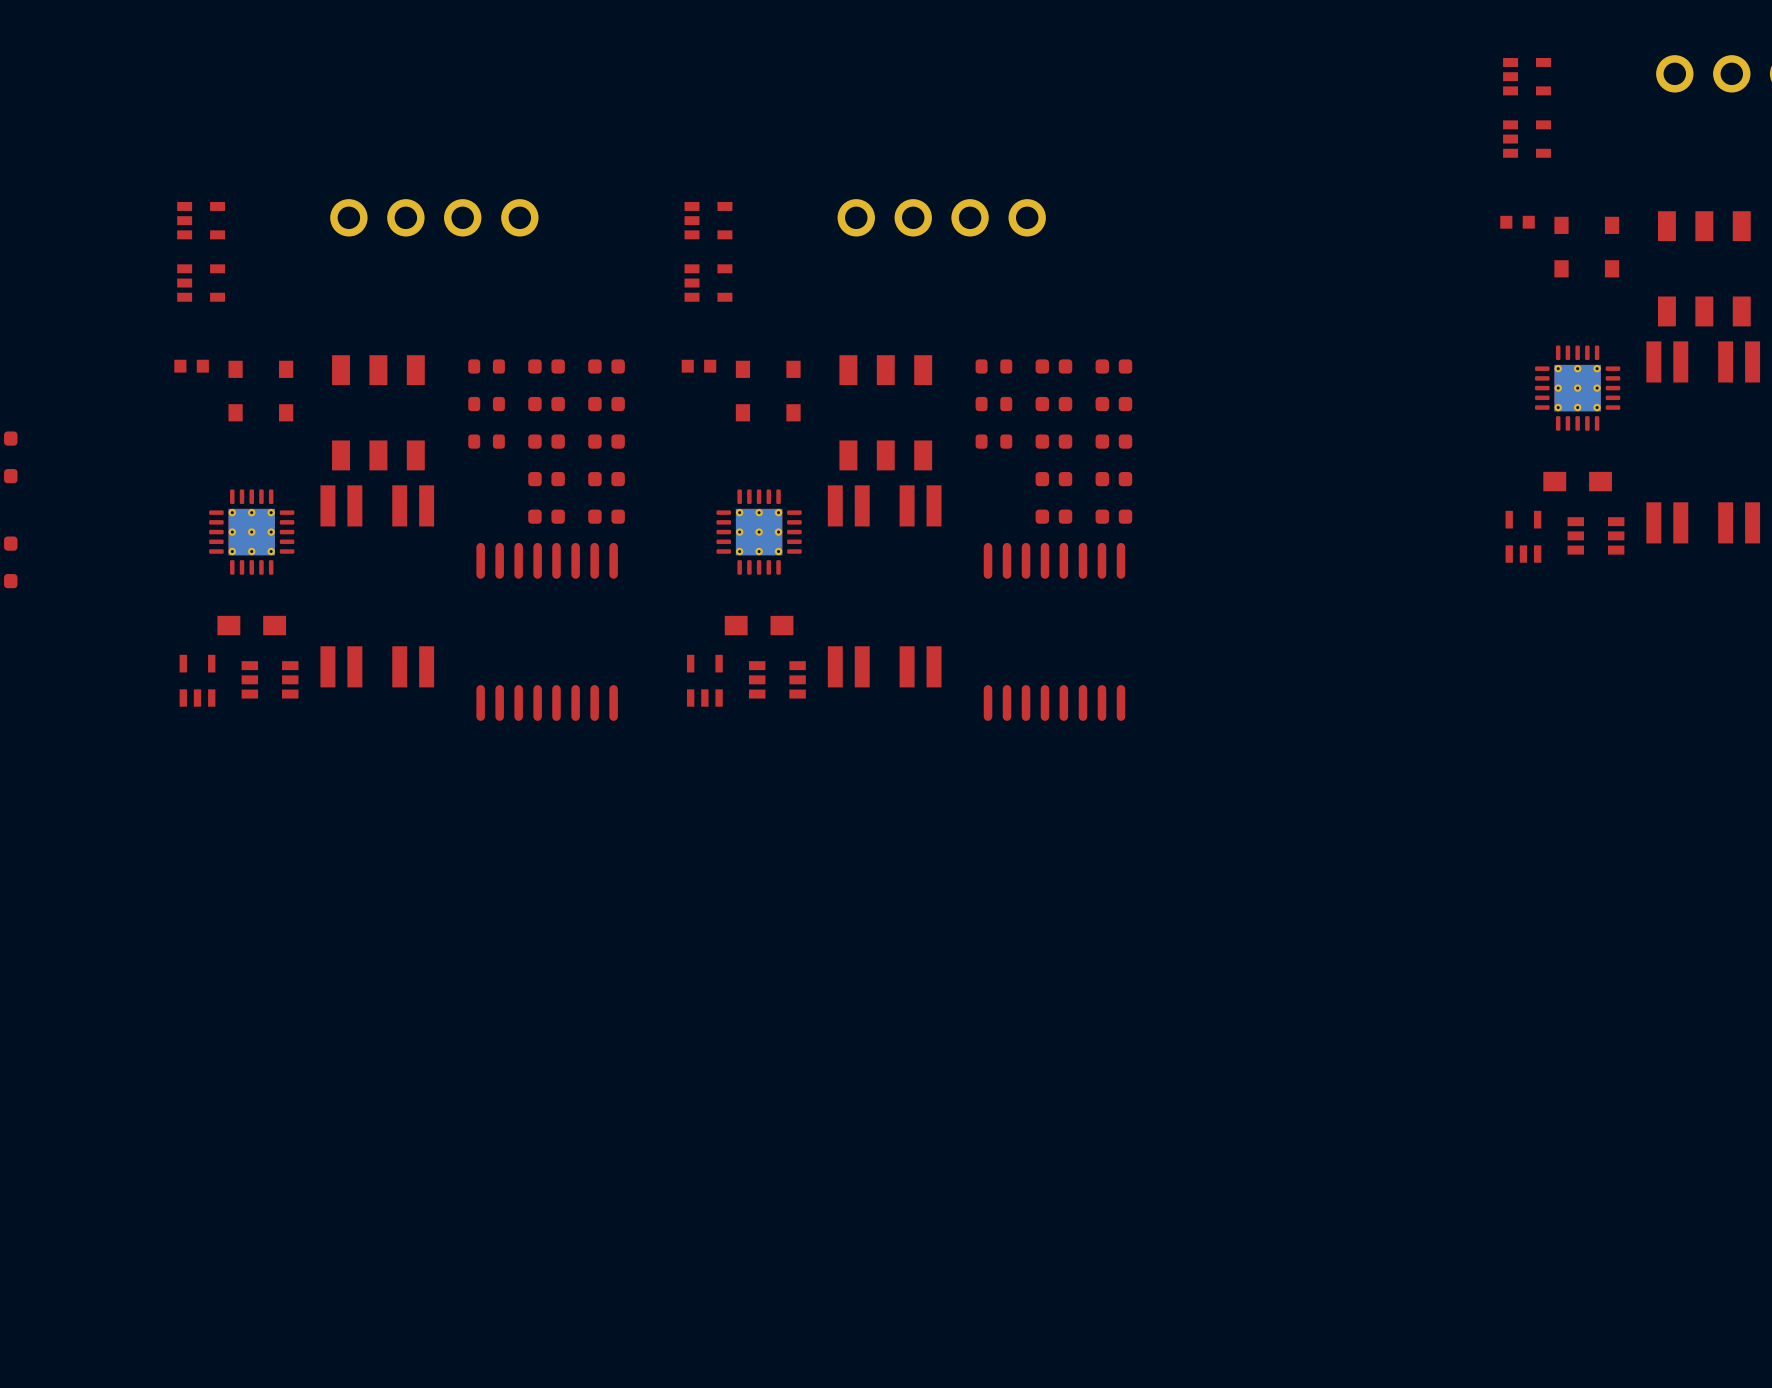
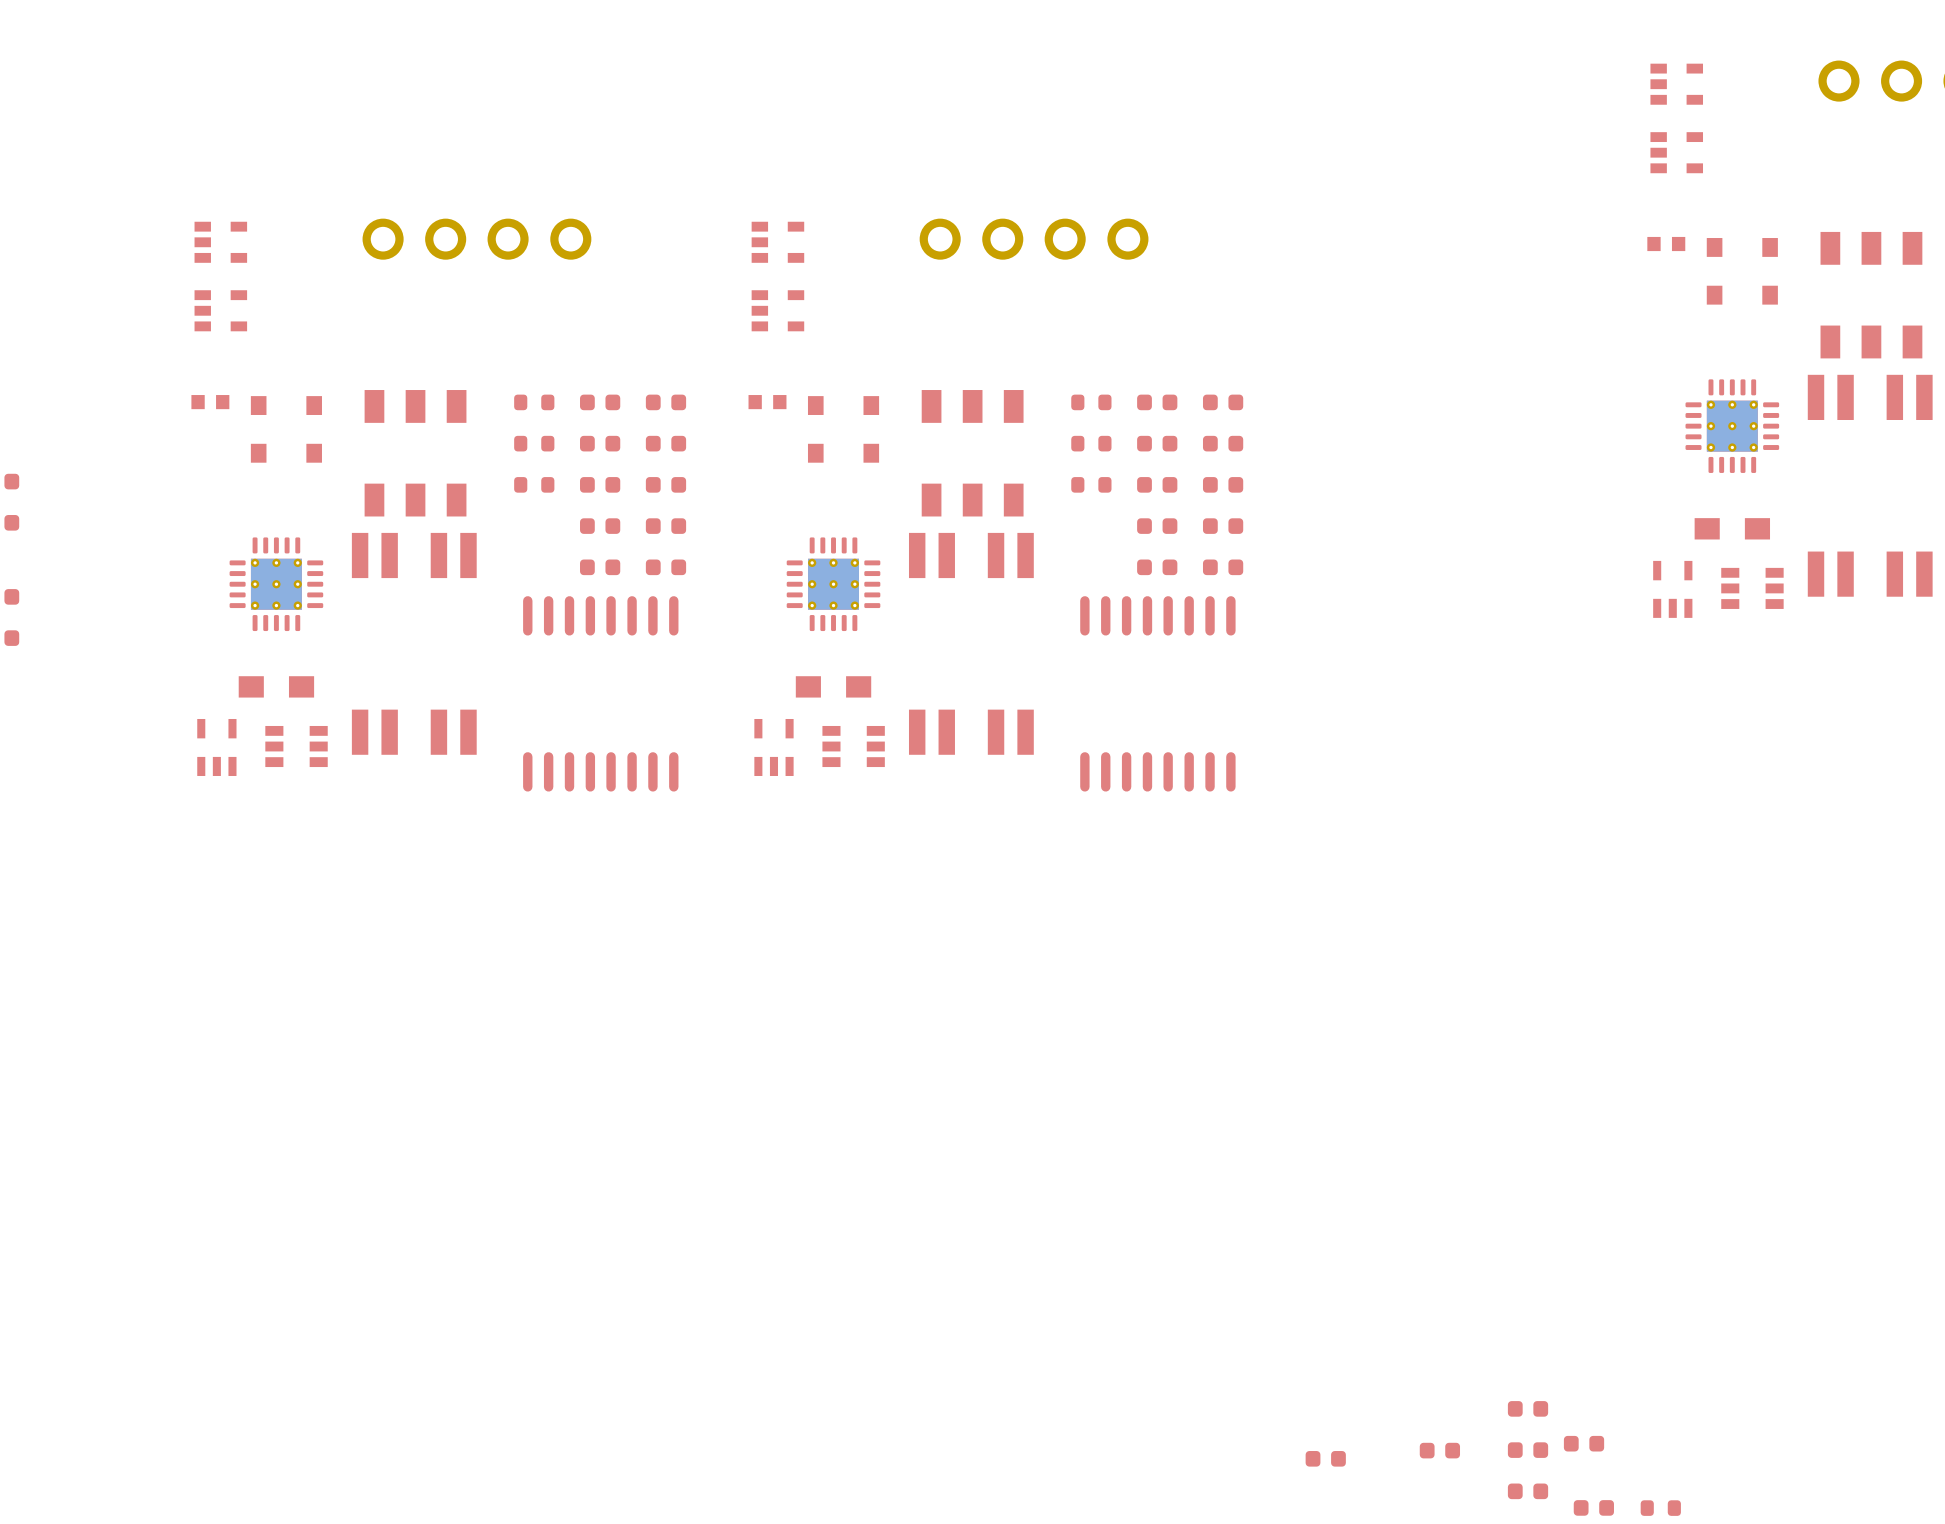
part: none -> (1528, 1408)
part: none -> (1584, 1443)
part: none -> (1528, 1450)
part: none -> (1439, 1450)
part: none -> (1325, 1458)
part: none -> (1528, 1491)
part: none -> (1593, 1507)
part: none -> (1660, 1508)

